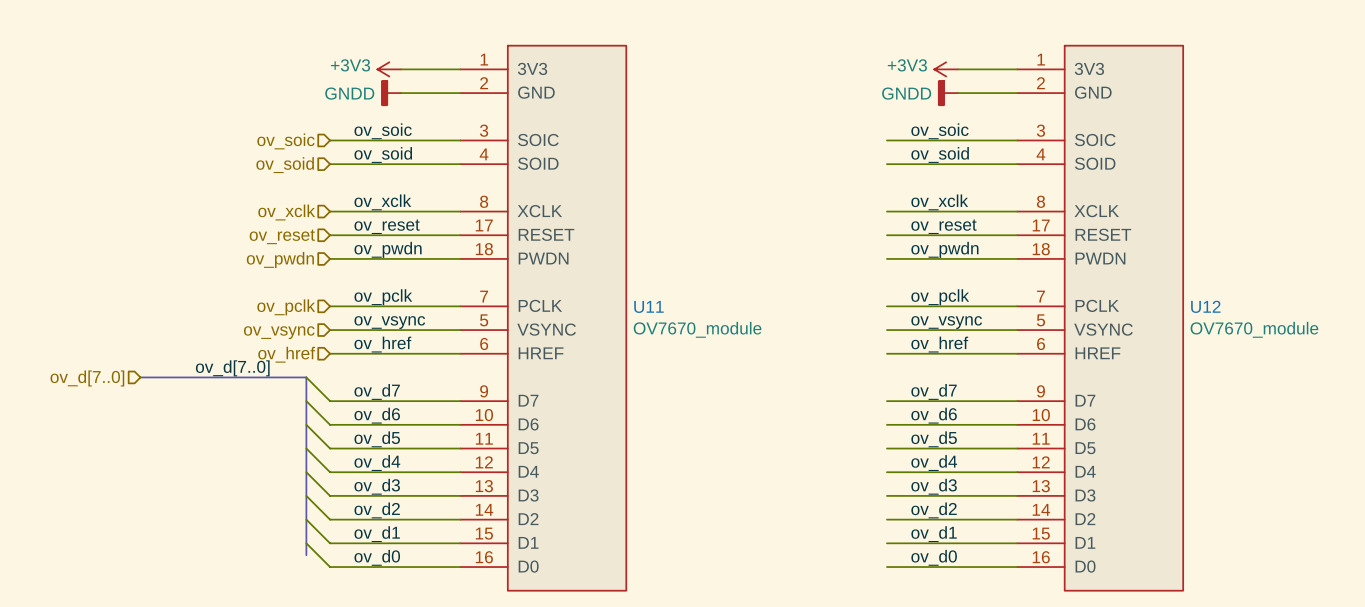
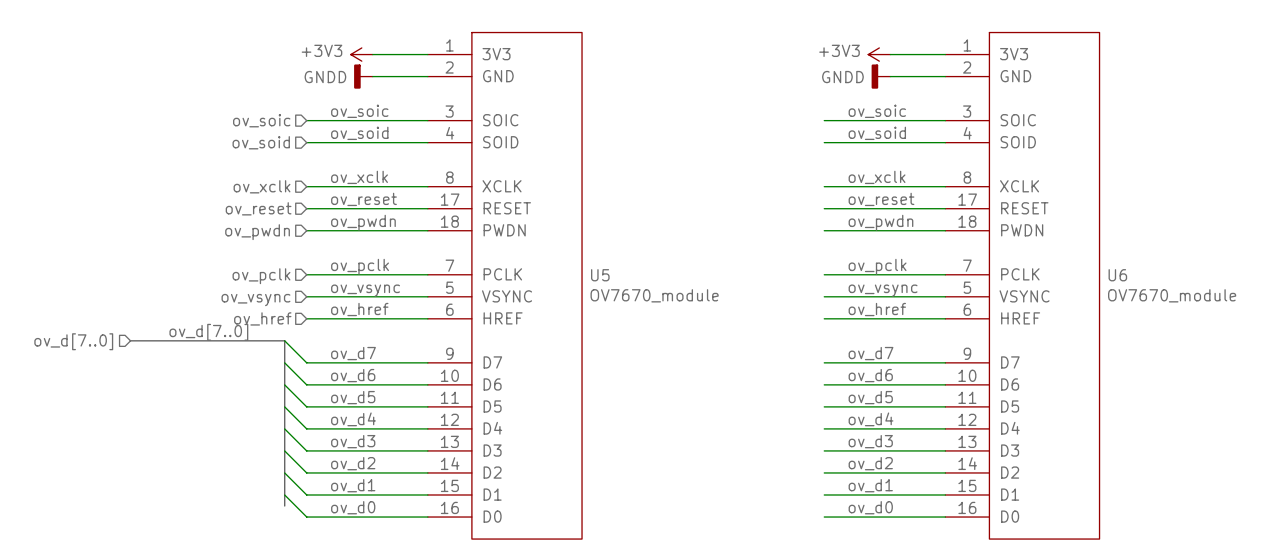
U11 name: U11 (648, 306) -> U5 (600, 275)
U12 name: U12 (1205, 306) -> U6 (1117, 275)

